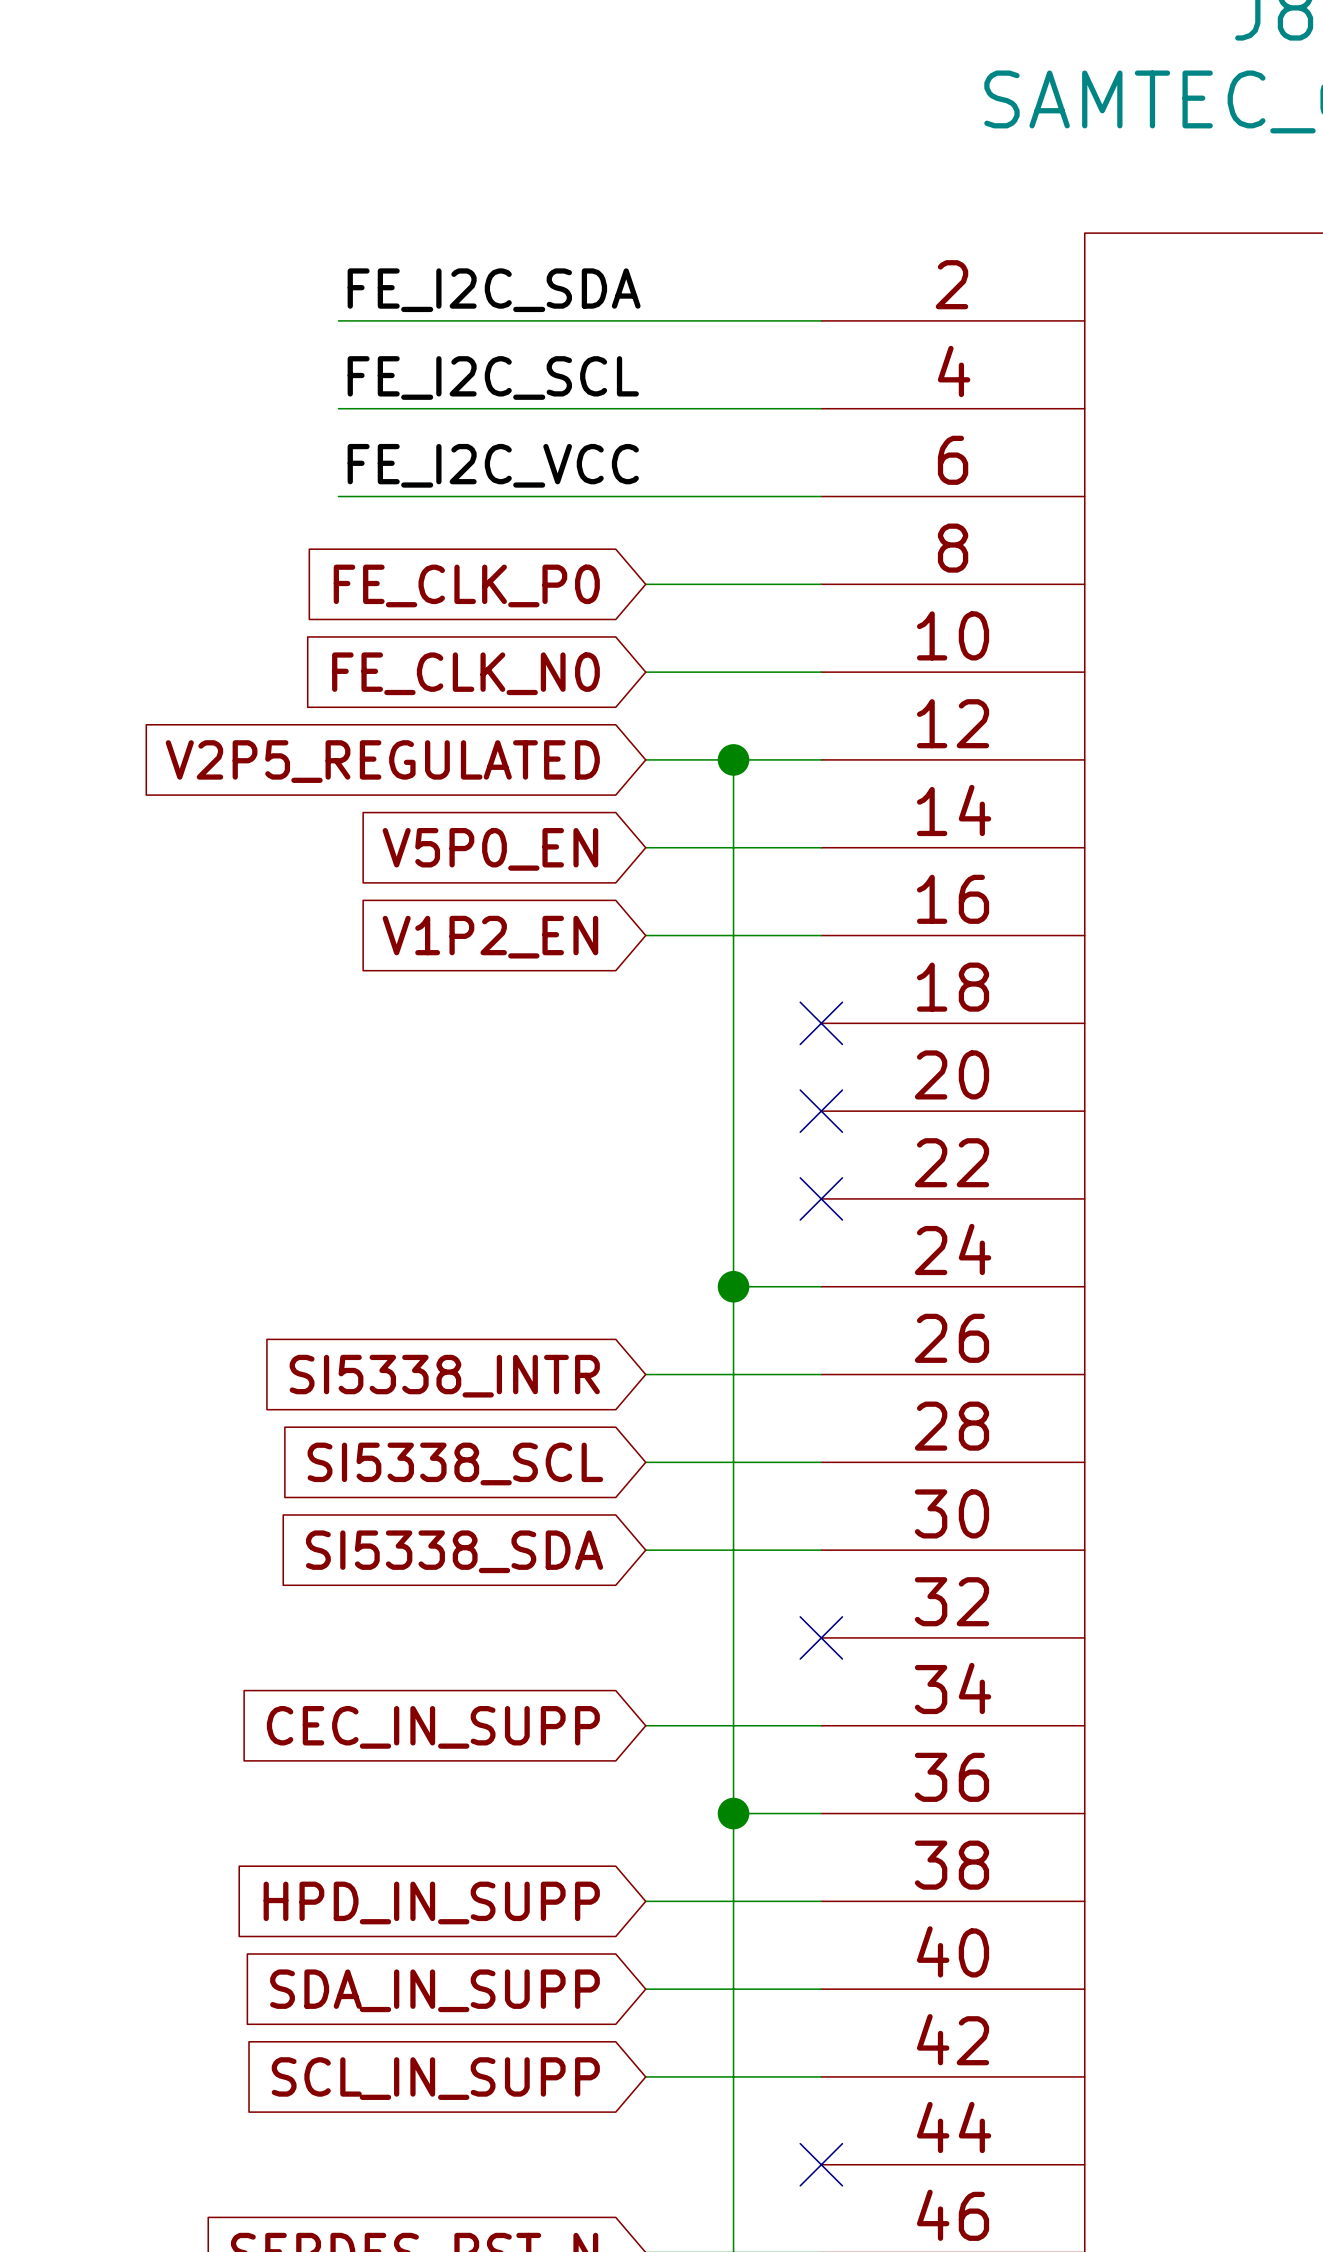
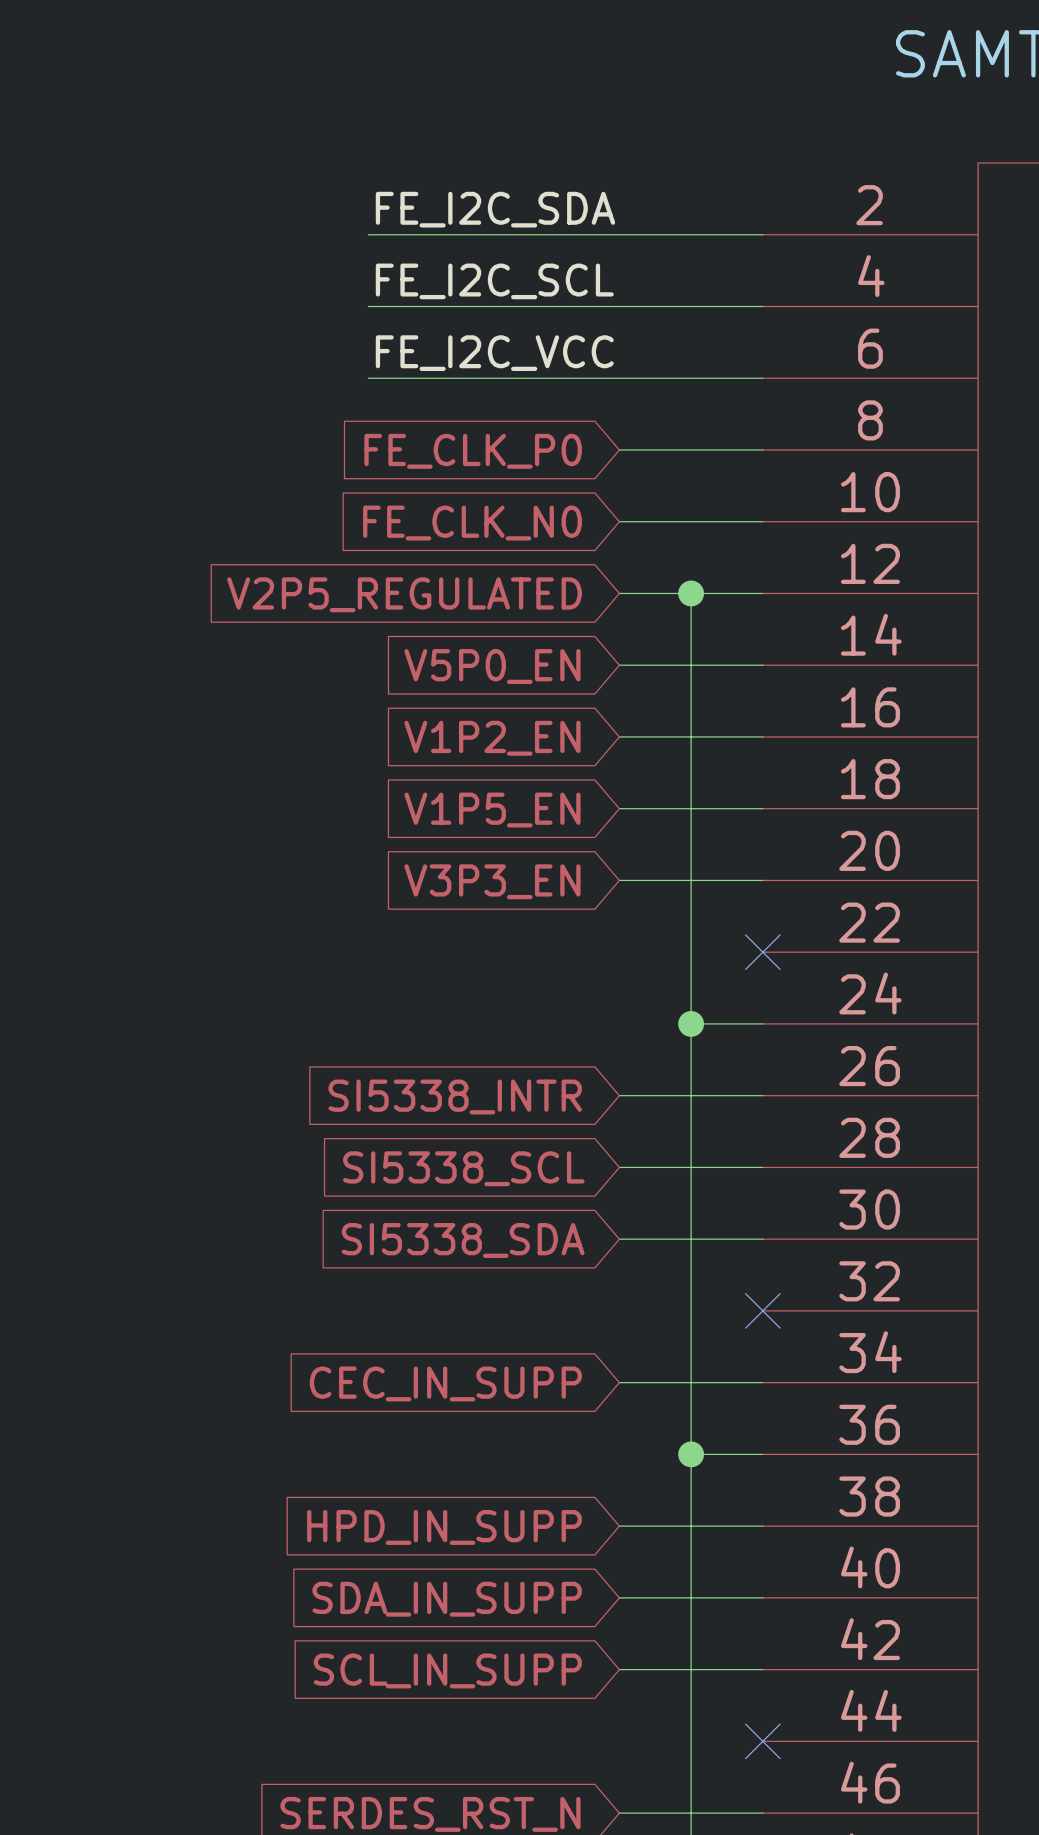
wire: none -> (619, 808) (762, 808)
no-connect mark: (821, 1023) -> none
global label: none -> V1P5_EN (492, 810)
wire: none -> (619, 880) (762, 880)
no-connect mark: (821, 1111) -> none
global label: none -> V3P3_EN (492, 881)

